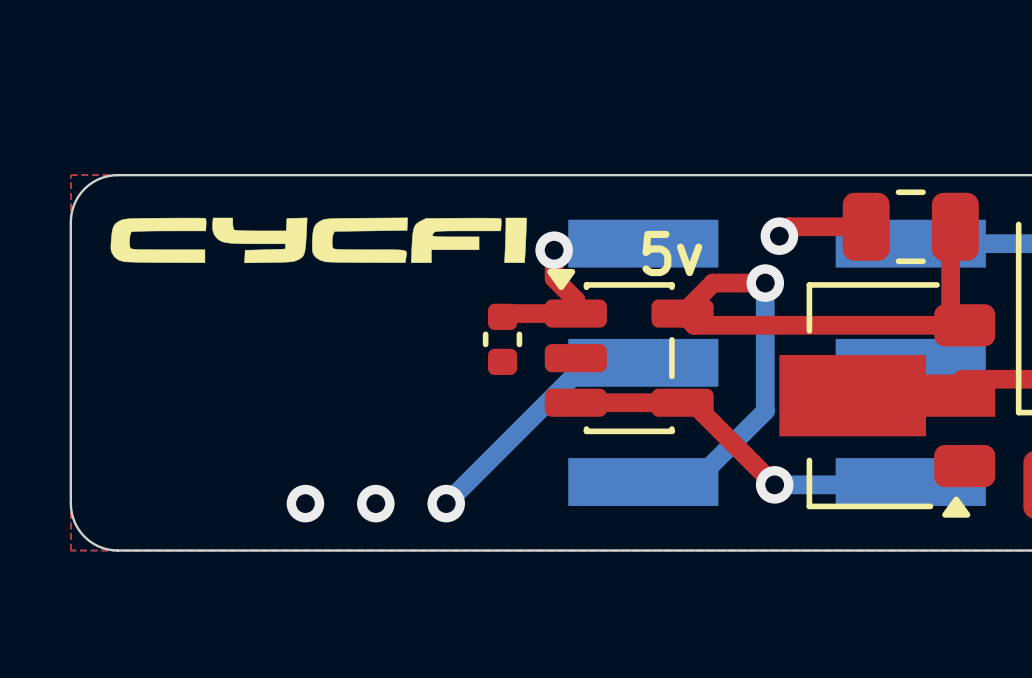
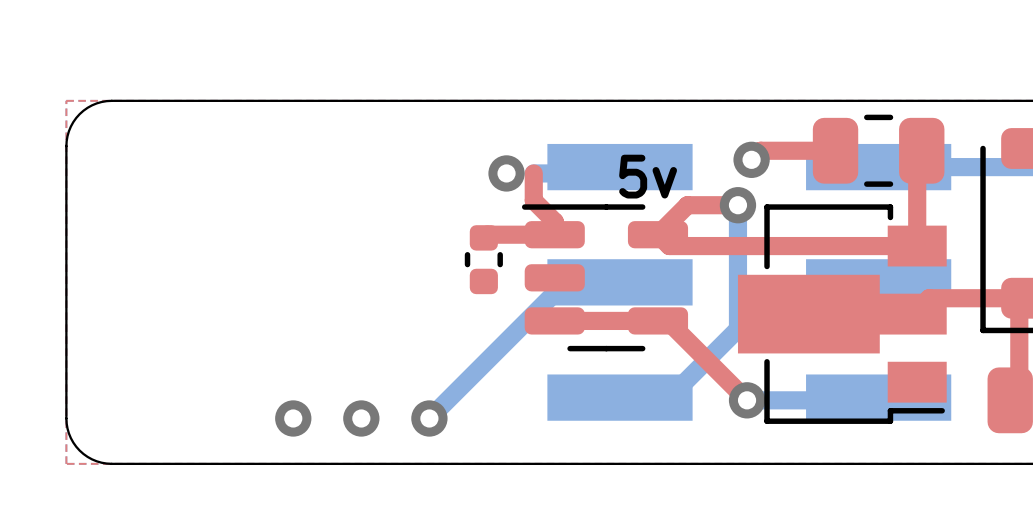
drawing: [110, 217, 527, 264] -> none
via position: (554, 250) -> (506, 173)
part footprint: [544, 268, 714, 435] -> [521, 204, 689, 352]
part footprint: [779, 282, 996, 518] -> [737, 204, 947, 424]

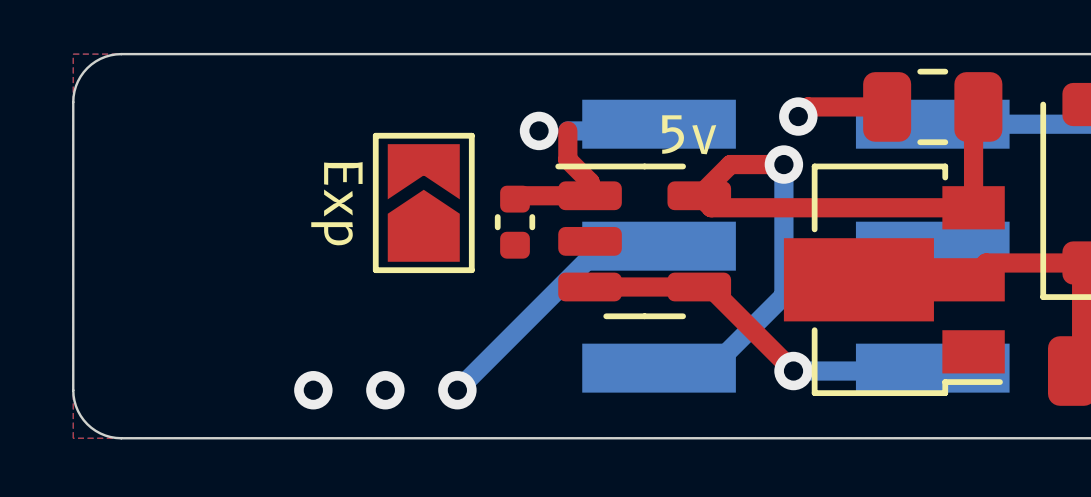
part: none -> (423, 202)
text: none -> Exp (336, 203)

